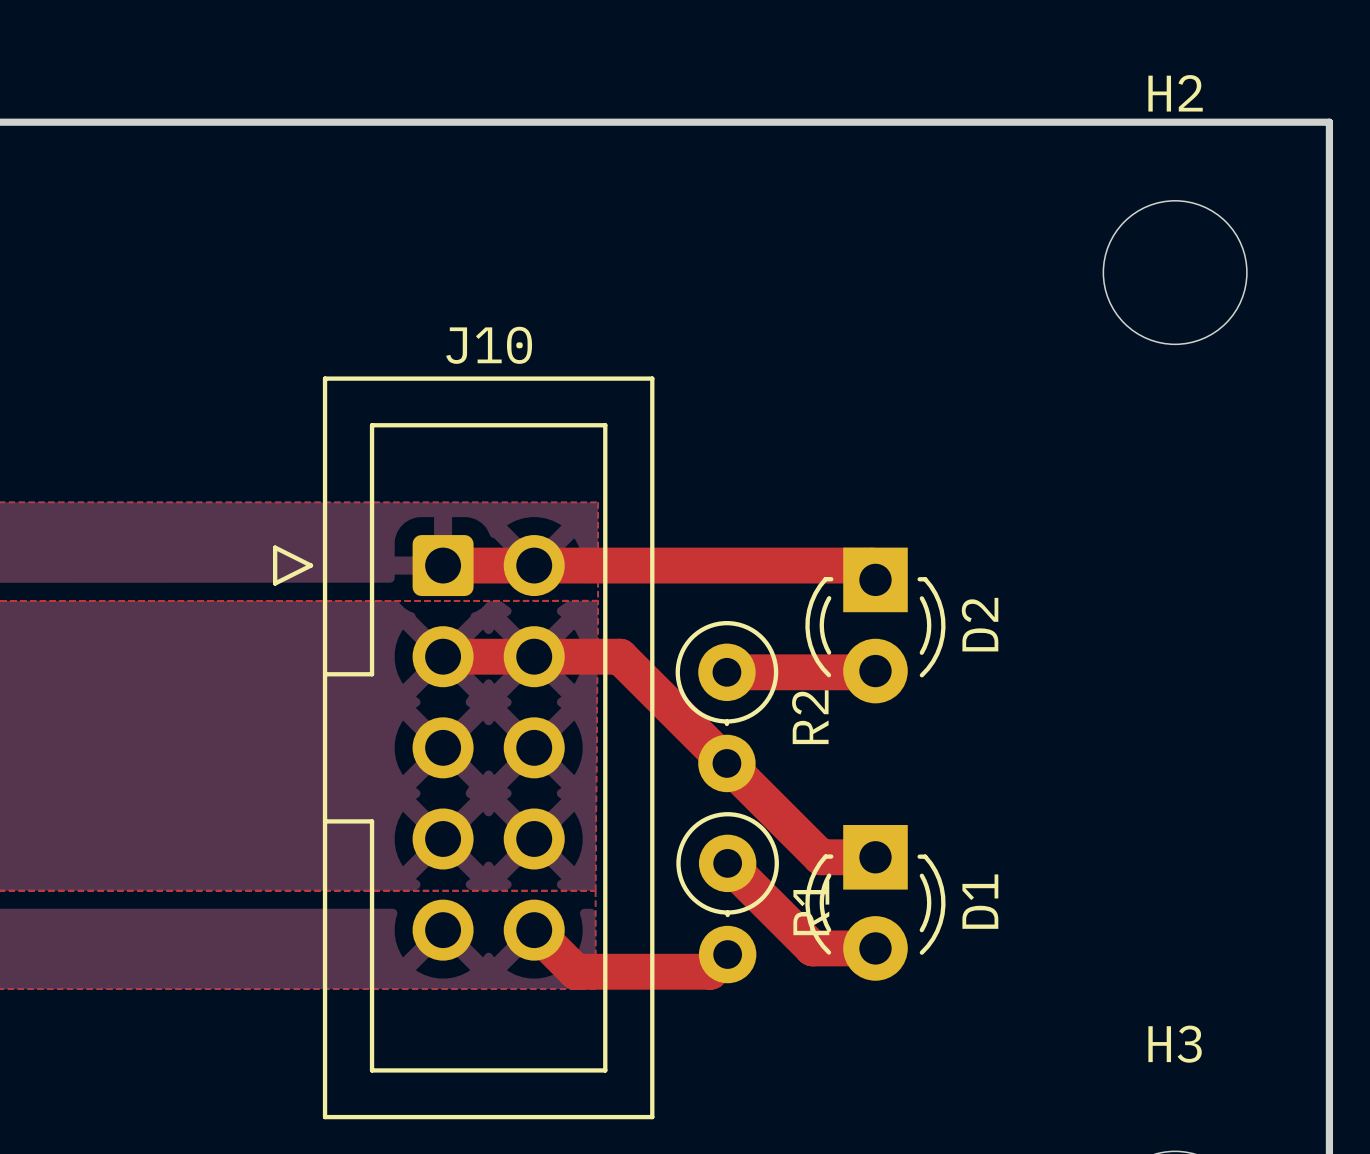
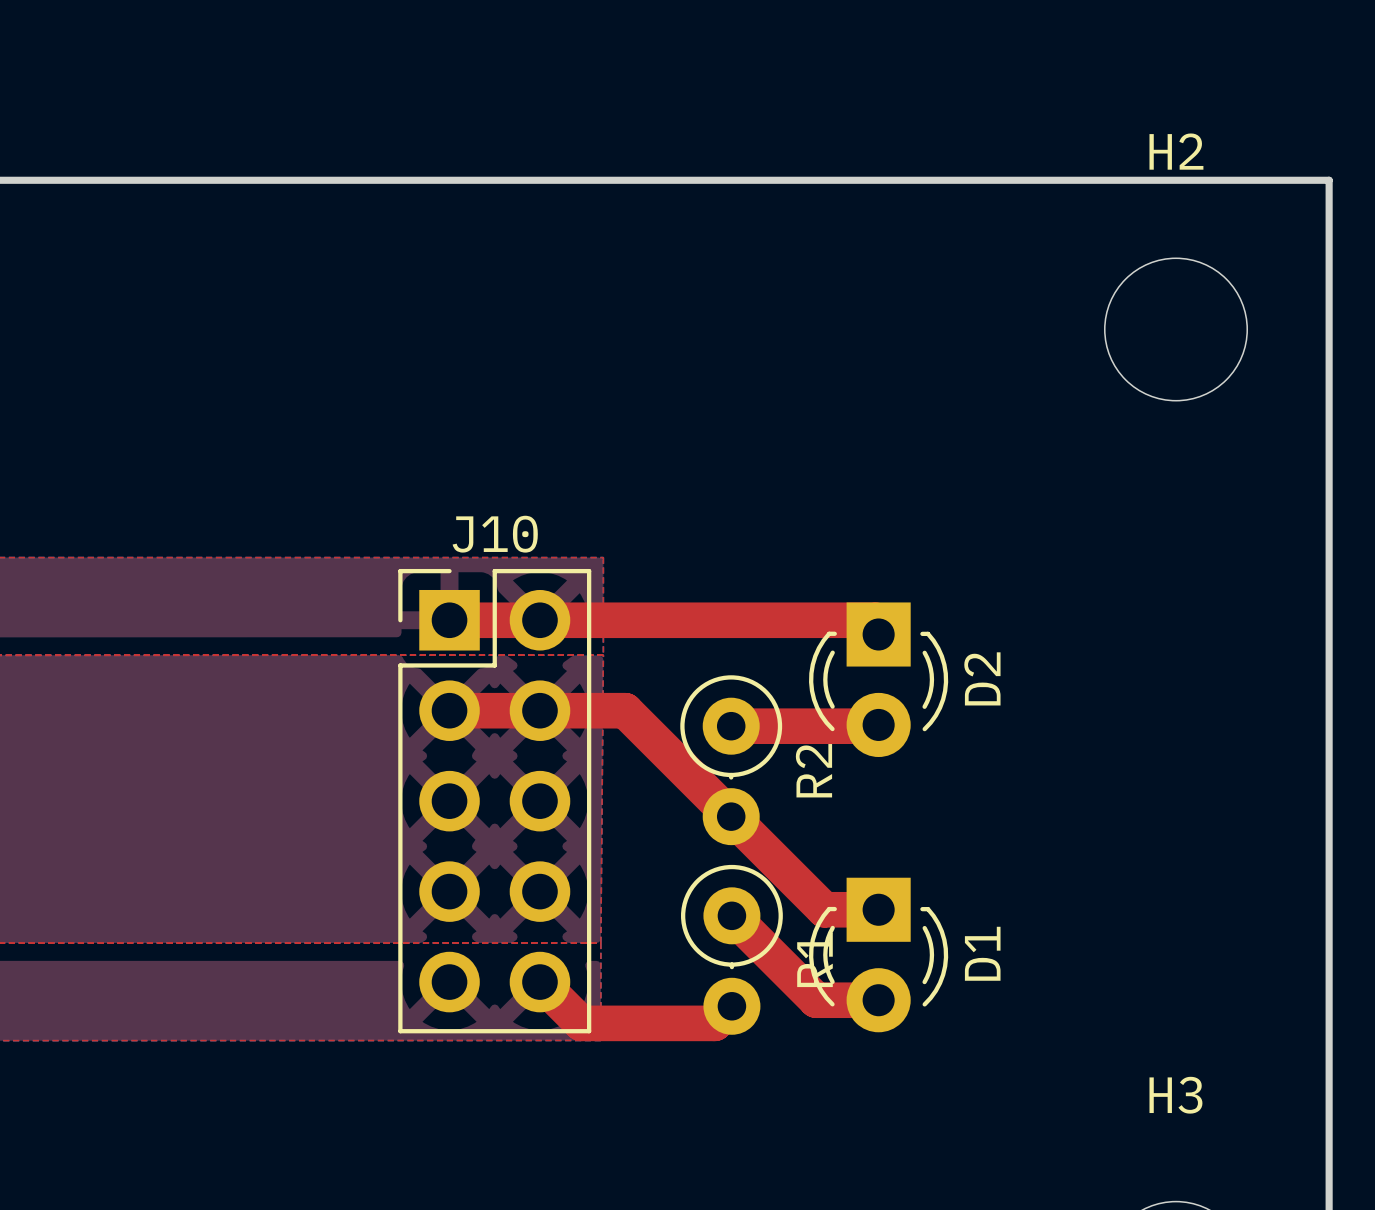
J10 name position: J10 (489, 345) -> J10 (495, 534)
J10 footprint: [273, 376, 655, 1120] -> [398, 568, 592, 1034]

